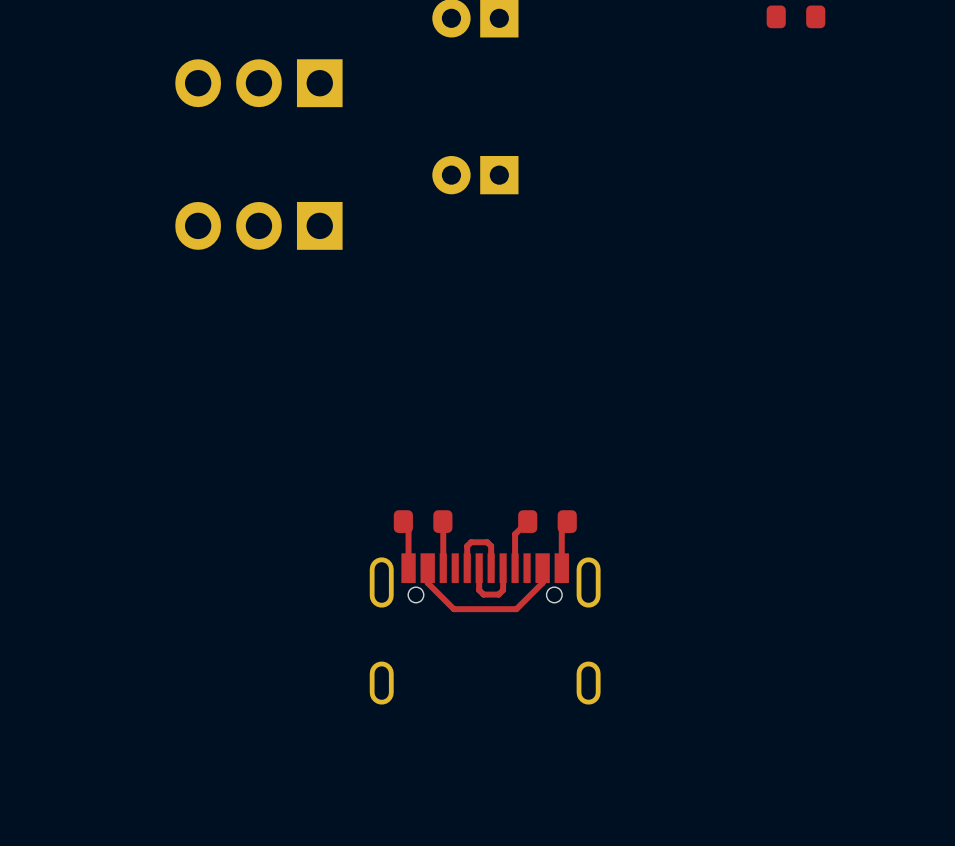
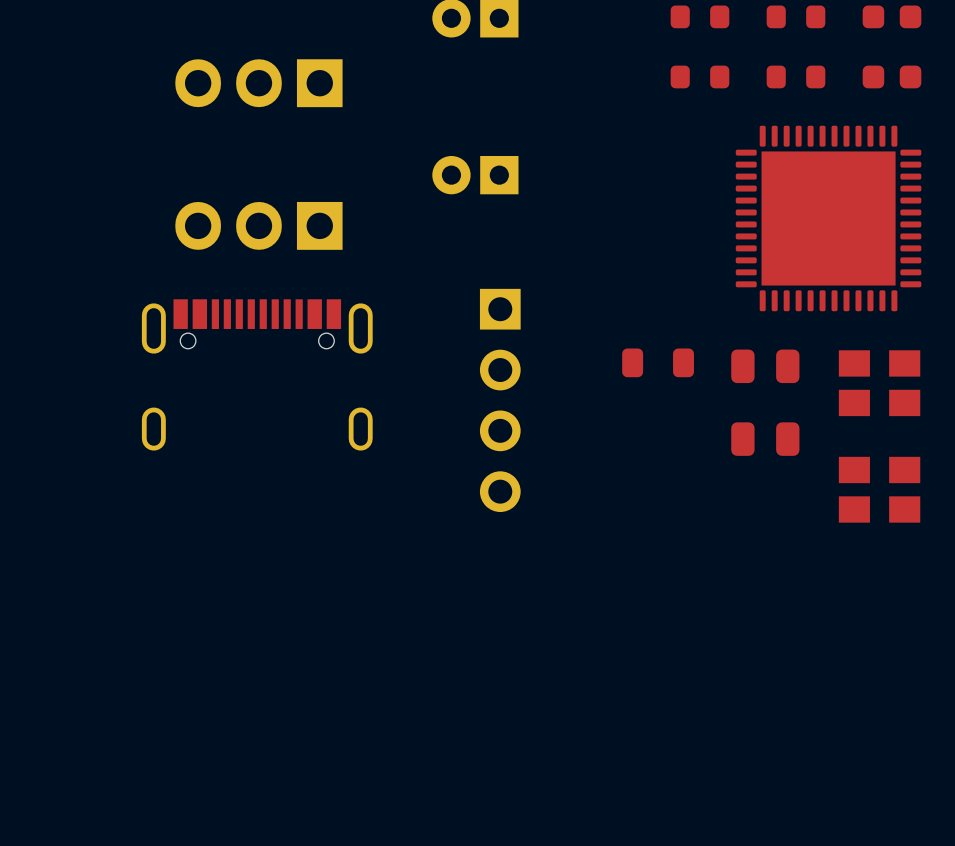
part: none -> (699, 16)
part: none -> (891, 16)
part: none -> (699, 76)
part: none -> (795, 76)
part: none -> (891, 76)
part: none -> (828, 218)
part: none -> (658, 362)
part: none -> (765, 366)
part: none -> (879, 383)
part: none -> (500, 400)
part: none -> (765, 439)
part: none -> (879, 489)
top track: (403, 521) (408, 526) (408, 568) -> none
part: (423, 521) -> none
top track: (442, 521) (443, 568) -> none
top track: (527, 521) (515, 534) (515, 568) -> none
part: (547, 521) -> none
top track: (567, 521) (561, 527) (561, 568) -> none
top track: (491, 568) (491, 546) (487, 542) (471, 542) (467, 546) (467, 568) -> none
top track: (503, 568) (503, 590) (498, 594) (483, 594) (479, 590) (479, 568) -> none
top track: (542, 568) (542, 582) (516, 609) (453, 609) (427, 582) (427, 568) -> none
part position: (485, 628) -> (257, 374)

